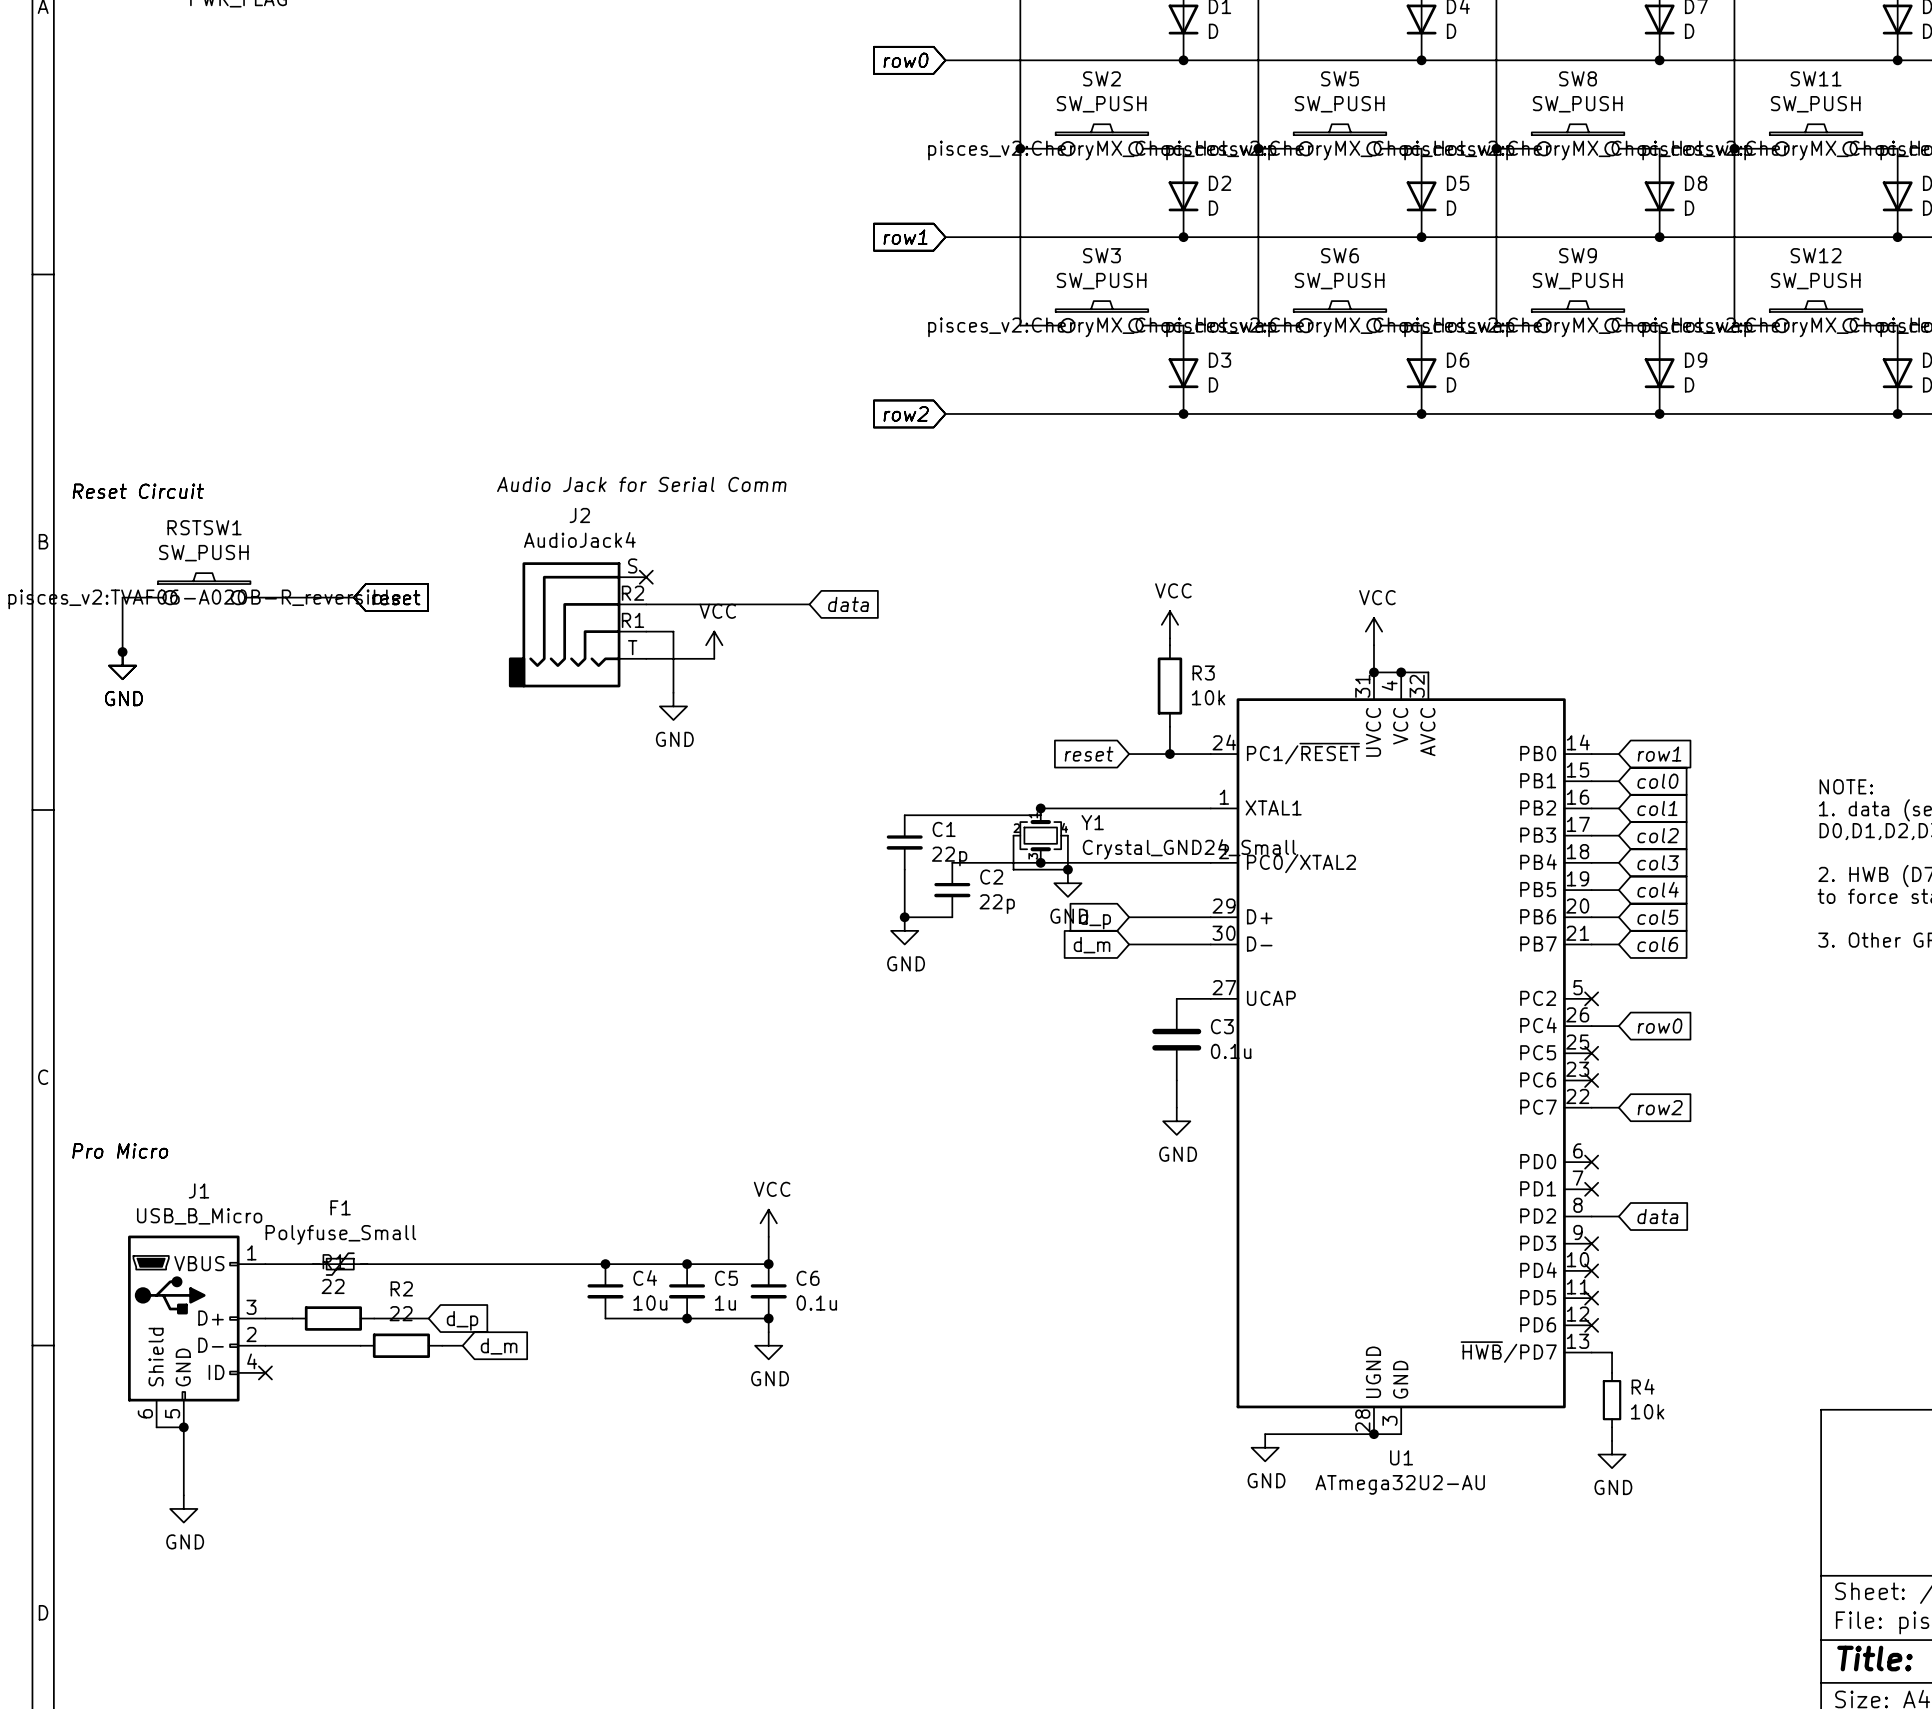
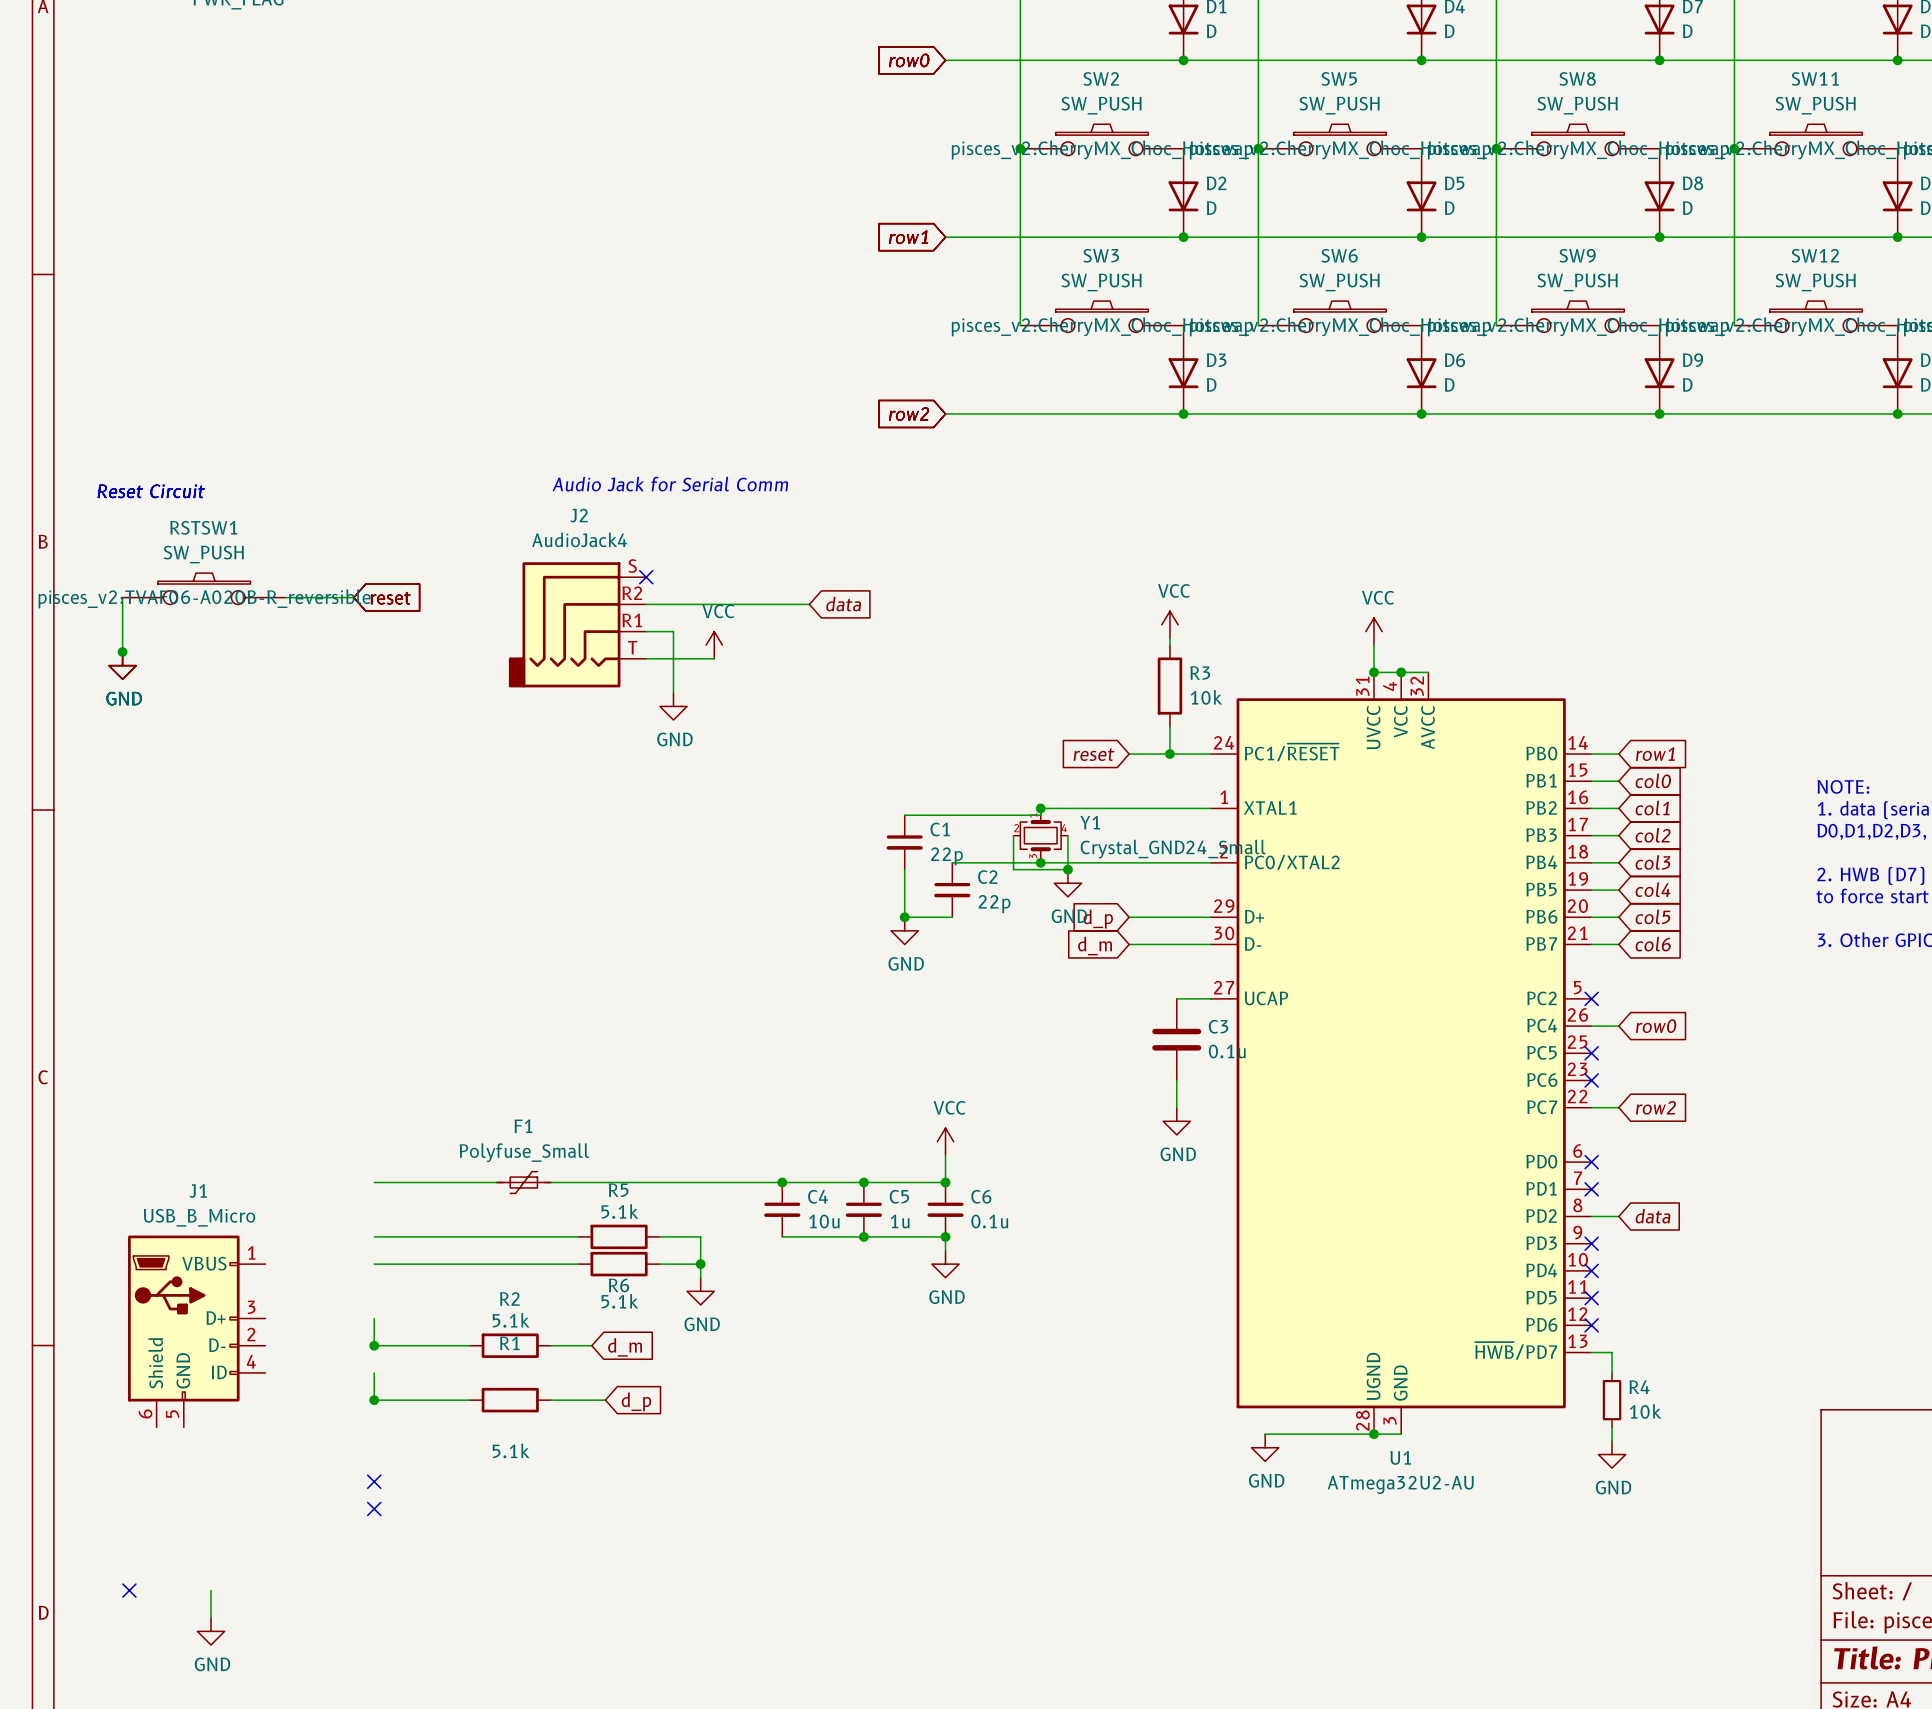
text: Pro Micro (120, 1150) -> none
wire: none -> (945, 1155) (945, 1182) (551, 1182)
wire: none -> (374, 1182) (496, 1182)
junction: none -> (782, 1182)
junction: none -> (863, 1182)
junction: none -> (945, 1182)
power symbol position: VCC (768, 1223) -> VCC (945, 1141)
wire: none -> (374, 1236) (578, 1236)
R5: none -> 5.1k (619, 1236)
wire: none -> (659, 1236) (700, 1236) (700, 1277)
wire: (768, 1236) (768, 1264) (700, 1264) -> none
junction: none -> (863, 1236)
junction: none -> (945, 1236)
wire: (265, 1264) (313, 1264) -> none
F1 position: (340, 1264) -> (523, 1182)
wire: (367, 1264) (374, 1264) -> (462, 1345) (469, 1345)
wire: (578, 1264) (659, 1264) -> none
junction: (605, 1264) -> none
R6: none -> 5.1k (619, 1264)
junction position: (687, 1264) -> (700, 1264)
junction: (768, 1264) -> none
power symbol: none -> GND (945, 1264)
R1 value: 22 (333, 1286) -> 5.1k (511, 1450)
R2 name position: R2 (401, 1288) -> R2 (509, 1298)
C4 position: (605, 1291) -> (782, 1209)
C5 position: (687, 1291) -> (863, 1209)
C6 position: (768, 1291) -> (945, 1209)
R2 value: 22 (401, 1313) -> 5.1k (511, 1320)
wire: (265, 1318) (292, 1318) -> none
R1 position: (333, 1318) -> (510, 1400)
wire: (374, 1318) (428, 1318) -> (374, 1318) (374, 1345) (442, 1345)
wire: (605, 1318) (768, 1318) (768, 1332) -> (782, 1236) (945, 1236) (945, 1250)
junction: (687, 1318) -> none
junction: (768, 1318) -> none
global label position: d_p (462, 1320) -> d_p (636, 1401)
wire: (265, 1345) (360, 1345) -> none
junction: none -> (374, 1345)
R2 position: (401, 1345) -> (510, 1345)
wire: none -> (551, 1345) (591, 1345)
power symbol position: GND (768, 1345) -> GND (700, 1291)
global label position: d_m (499, 1346) -> d_m (625, 1347)
no-connect mark: (265, 1372) -> none
wire: none -> (374, 1372) (374, 1400) (469, 1400)
junction: none -> (374, 1400)
wire: none -> (551, 1400) (605, 1400)
wire: (156, 1427) (183, 1427) (183, 1495) -> none
junction: (183, 1427) -> none
no-connect mark: none -> (374, 1481)
power symbol position: GND (183, 1508) -> GND (211, 1631)
no-connect mark: none -> (374, 1508)
no-connect mark: none -> (129, 1590)
wire: none -> (211, 1590) (211, 1617)

